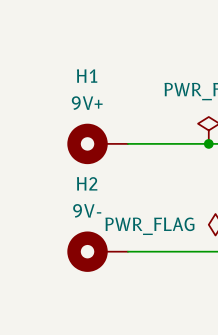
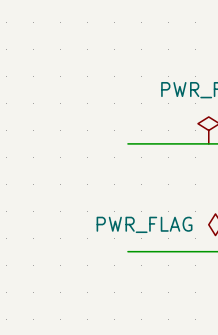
H1: 9V+ (97, 143) -> none
junction: (208, 143) -> none
H2: 9V- (97, 251) -> none

